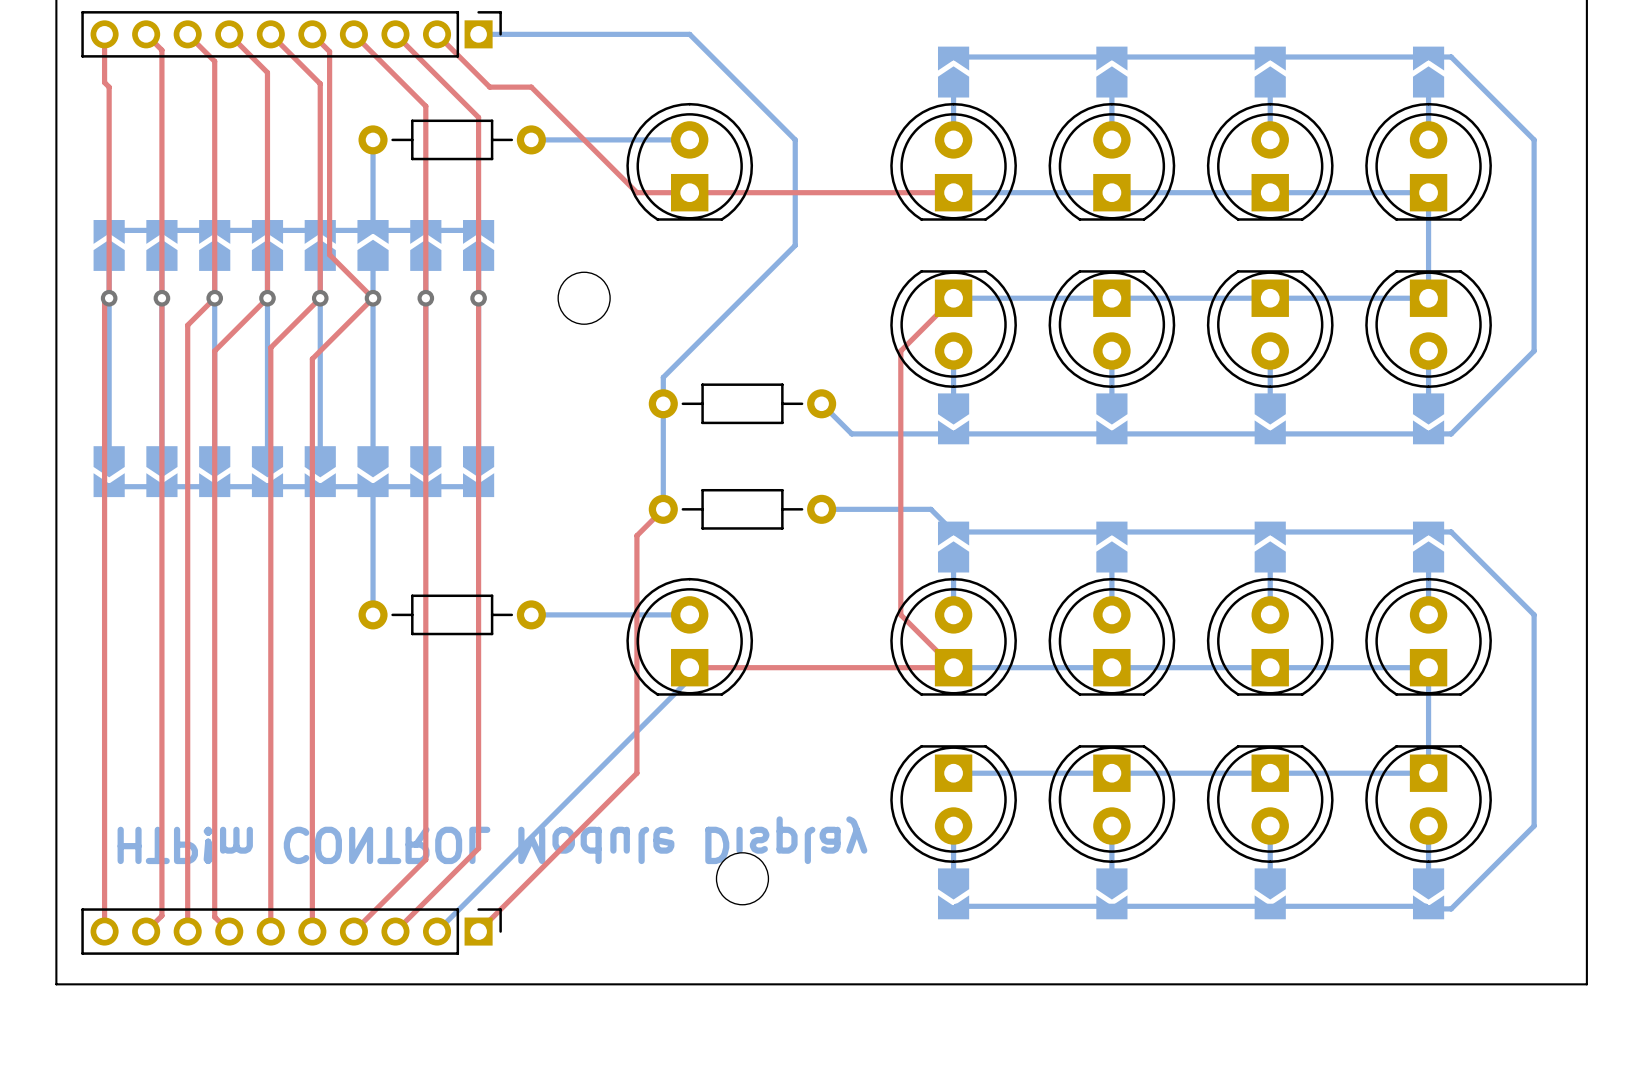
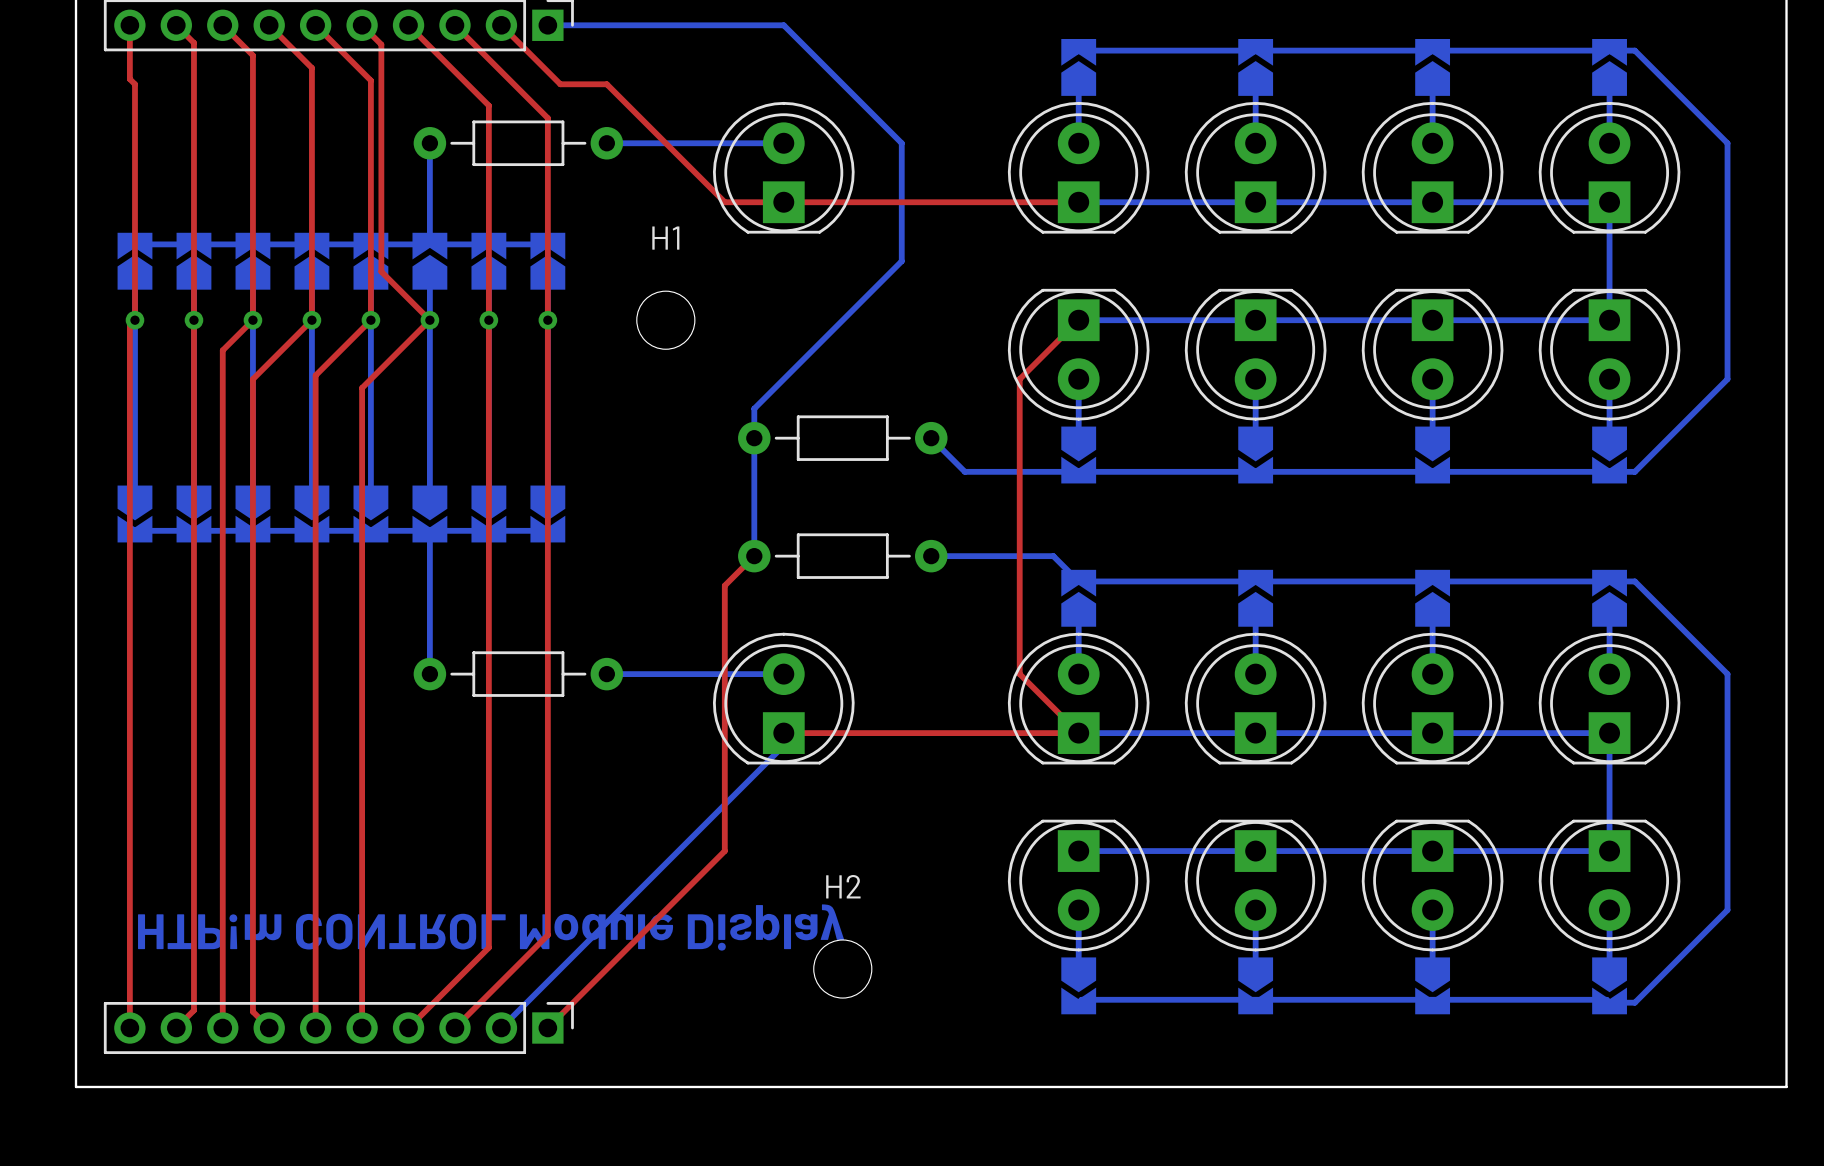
H1 name: none -> H1 (665, 238)
H2 name: none -> H2 (843, 886)

